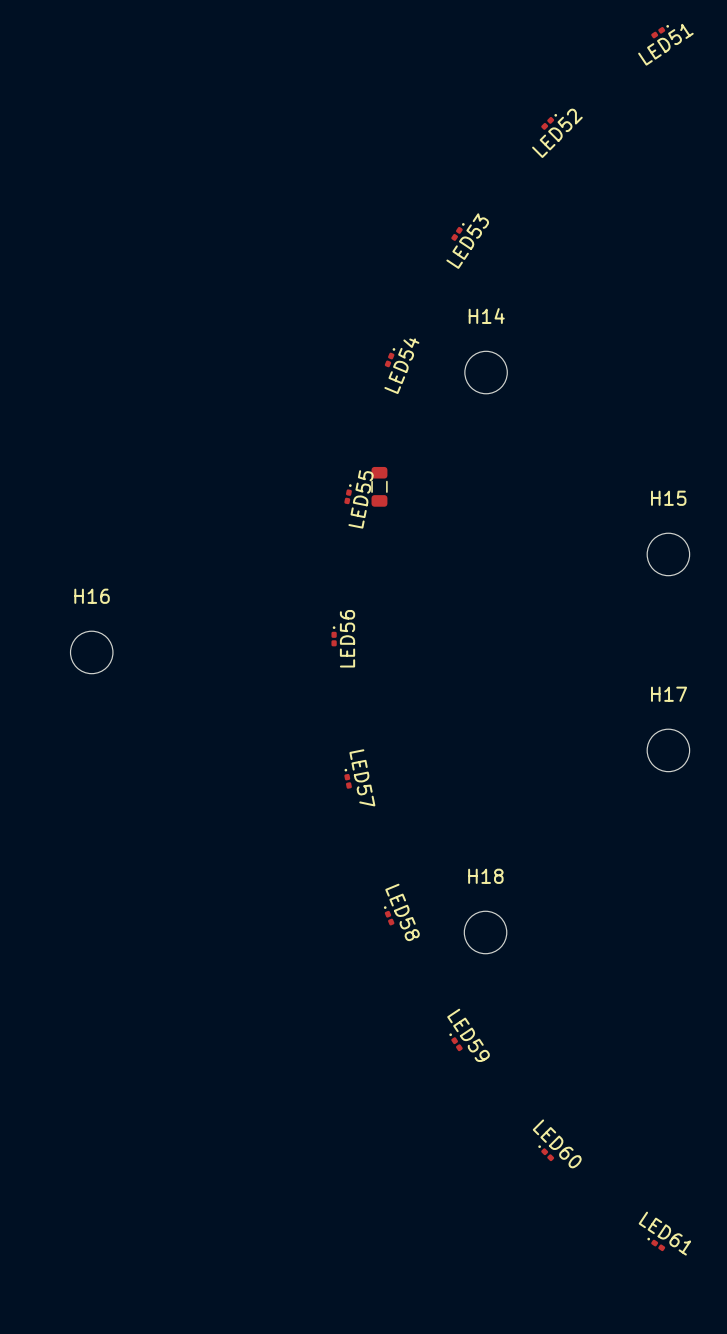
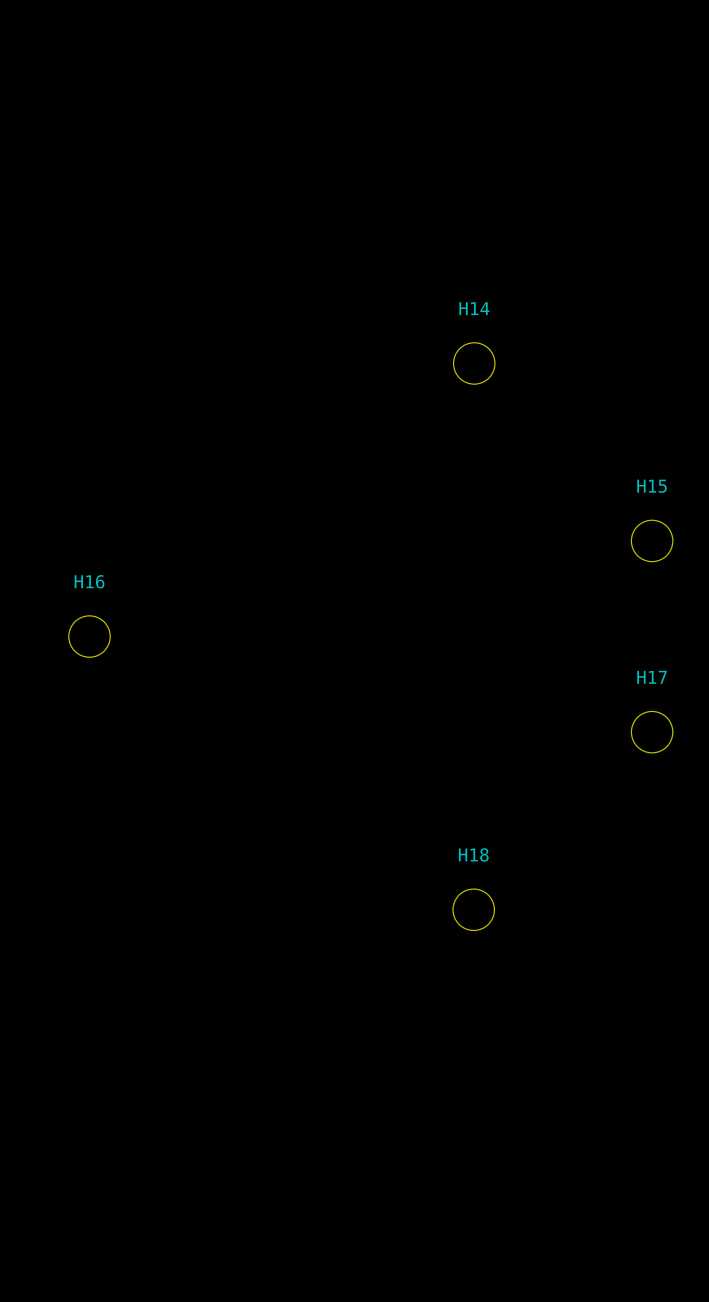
LED51: (660, 31) -> none
LED52: (549, 121) -> none
LED53: (457, 232) -> none
LED54: (390, 357) -> none
part: (379, 486) -> none
LED55: (348, 494) -> none
LED56: (334, 636) -> none
LED57: (348, 778) -> none
LED58: (389, 915) -> none
LED59: (456, 1042) -> none
LED60: (546, 1153) -> none
LED61: (656, 1244) -> none

